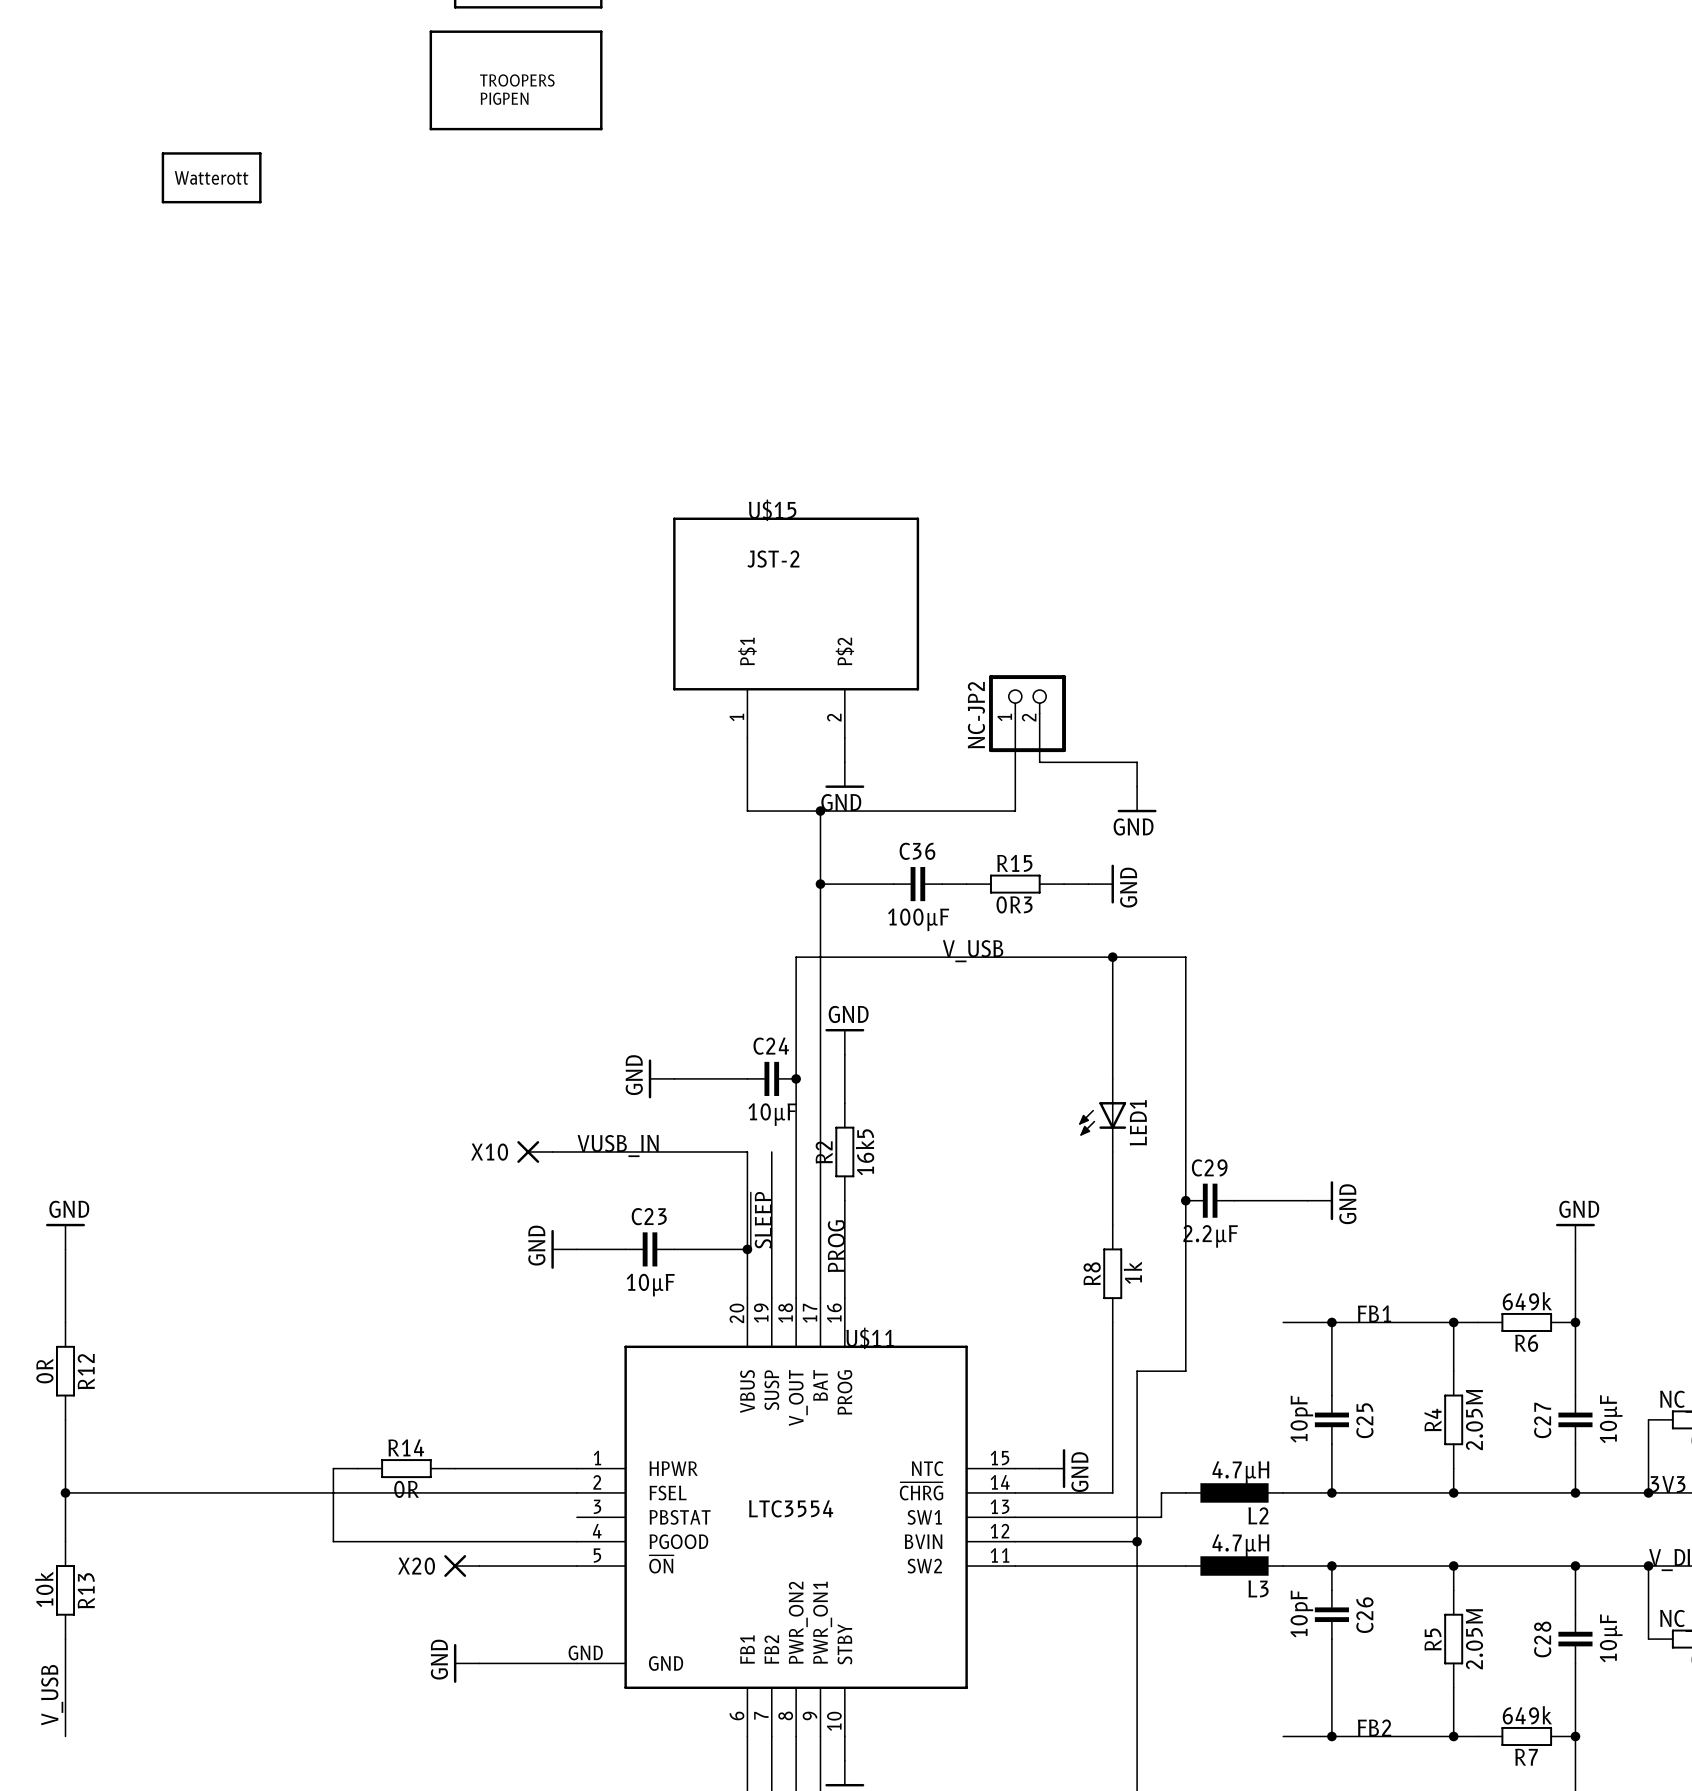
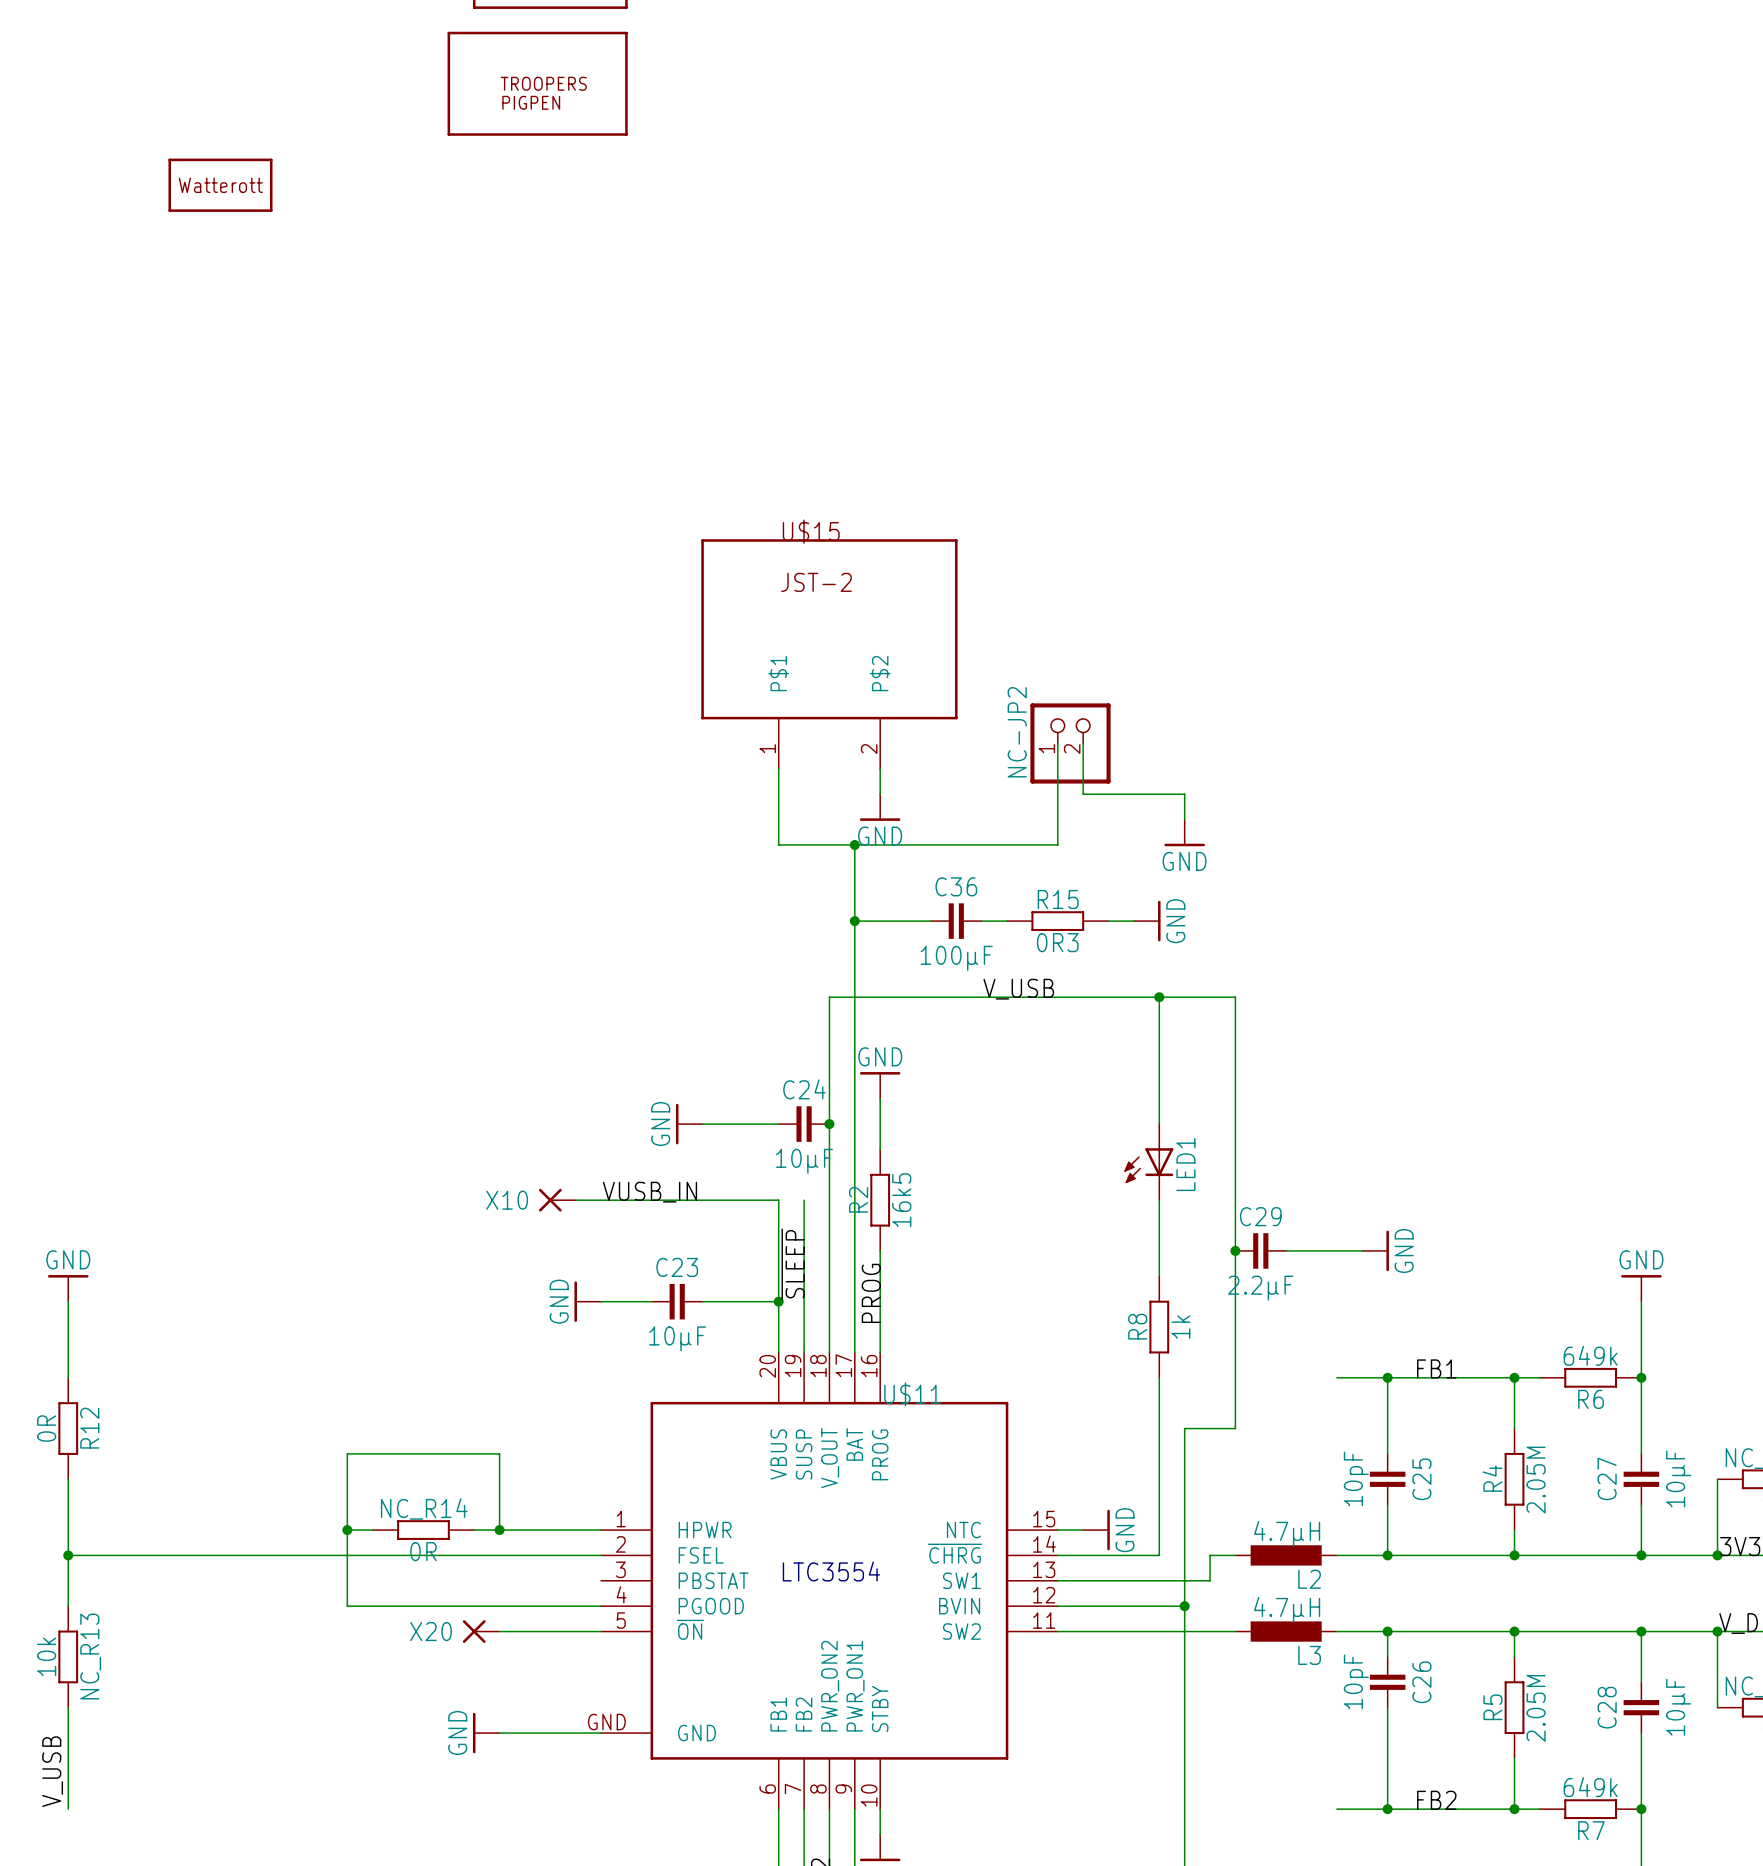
R14 name: R14 (406, 1447) -> NC_R14 (424, 1508)
wire: none -> (347, 1530) (347, 1453) (499, 1453) (499, 1530)
junction: none -> (347, 1530)
junction: none -> (499, 1530)
R13 name: R13 (86, 1590) -> NC_R13 (90, 1656)

